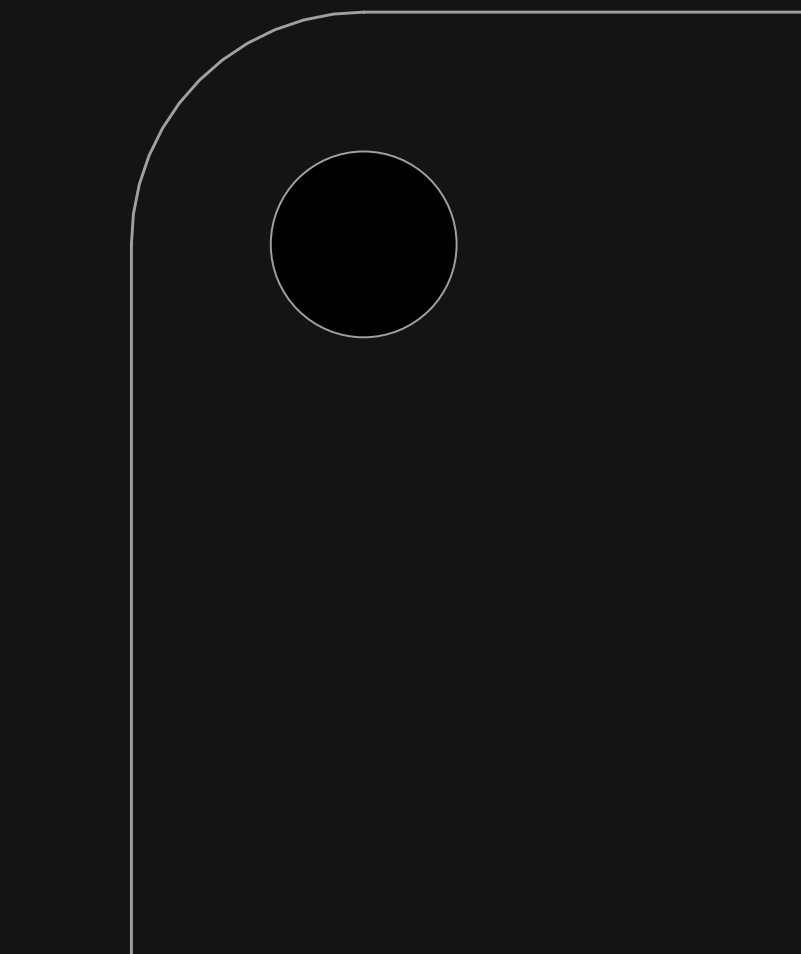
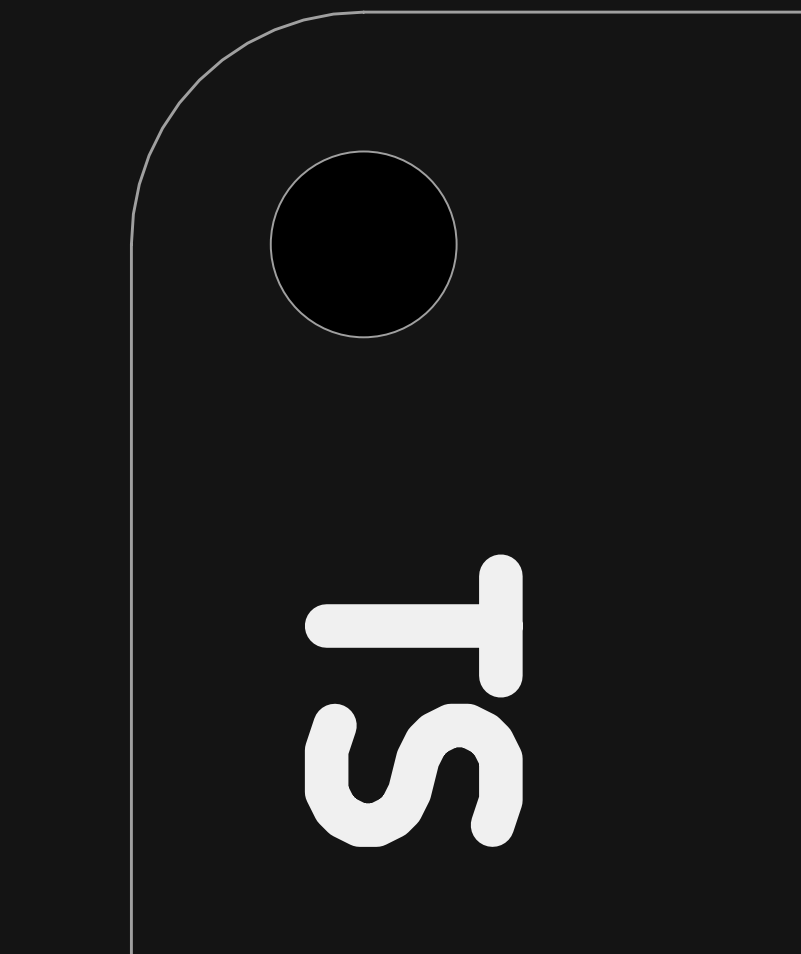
text: none -> TS (413, 700)

